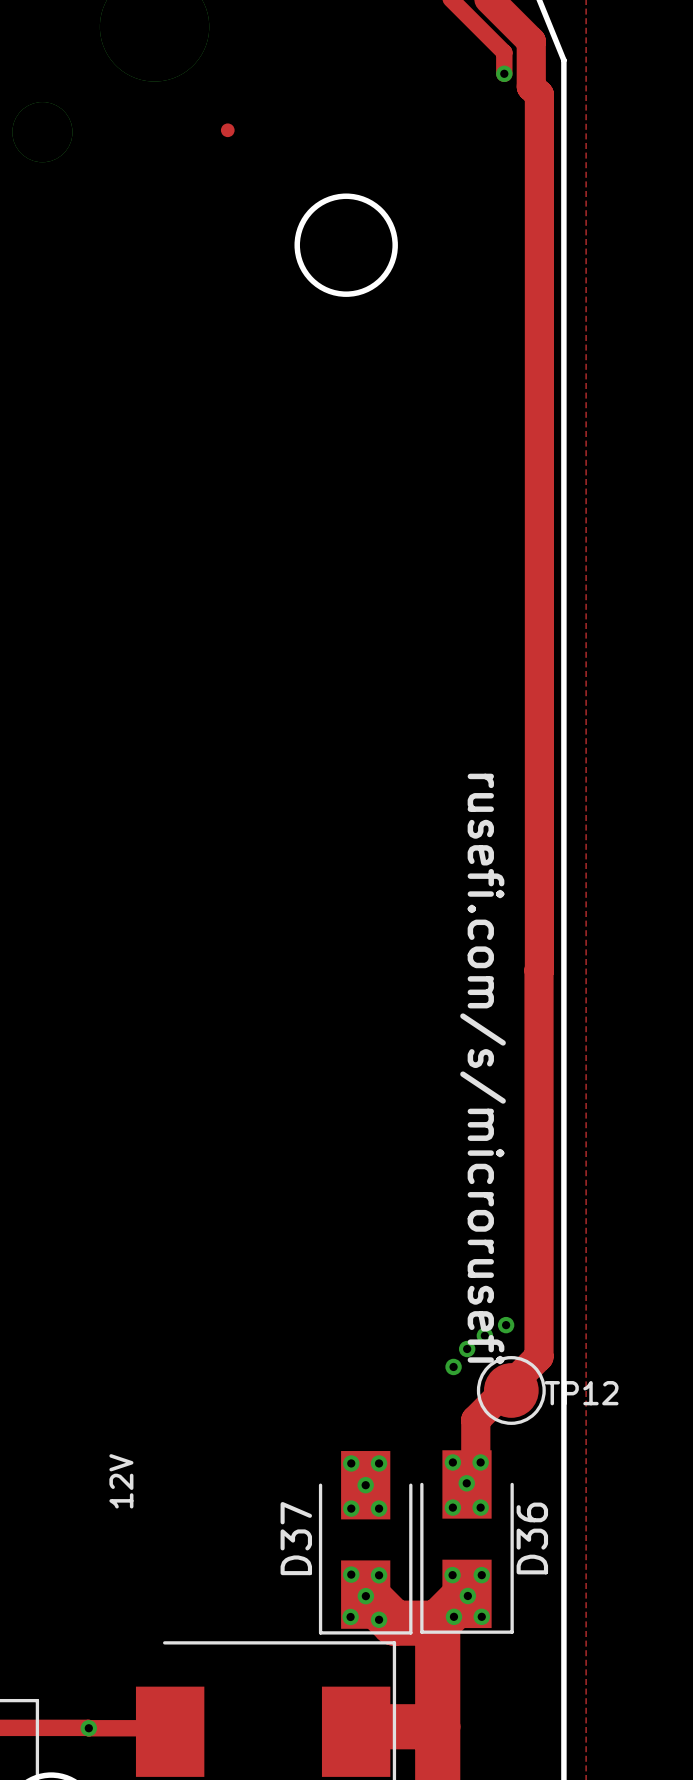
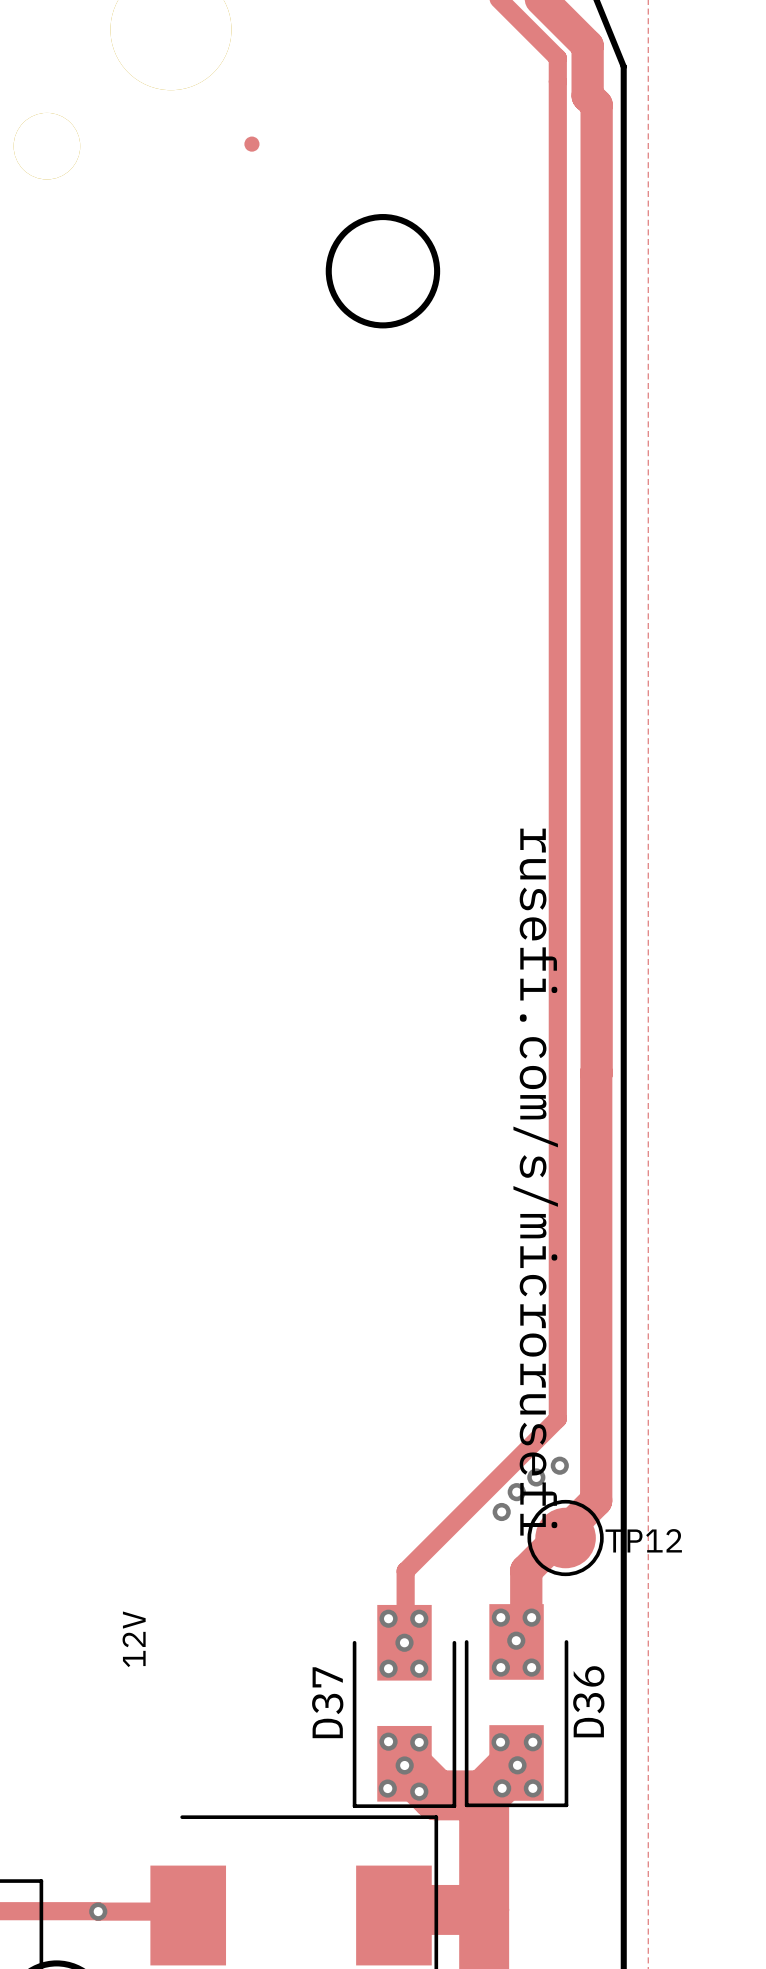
track: none -> (557, 81) (557, 1418) (405, 1571) (404, 1642)
via: (504, 73) -> none

